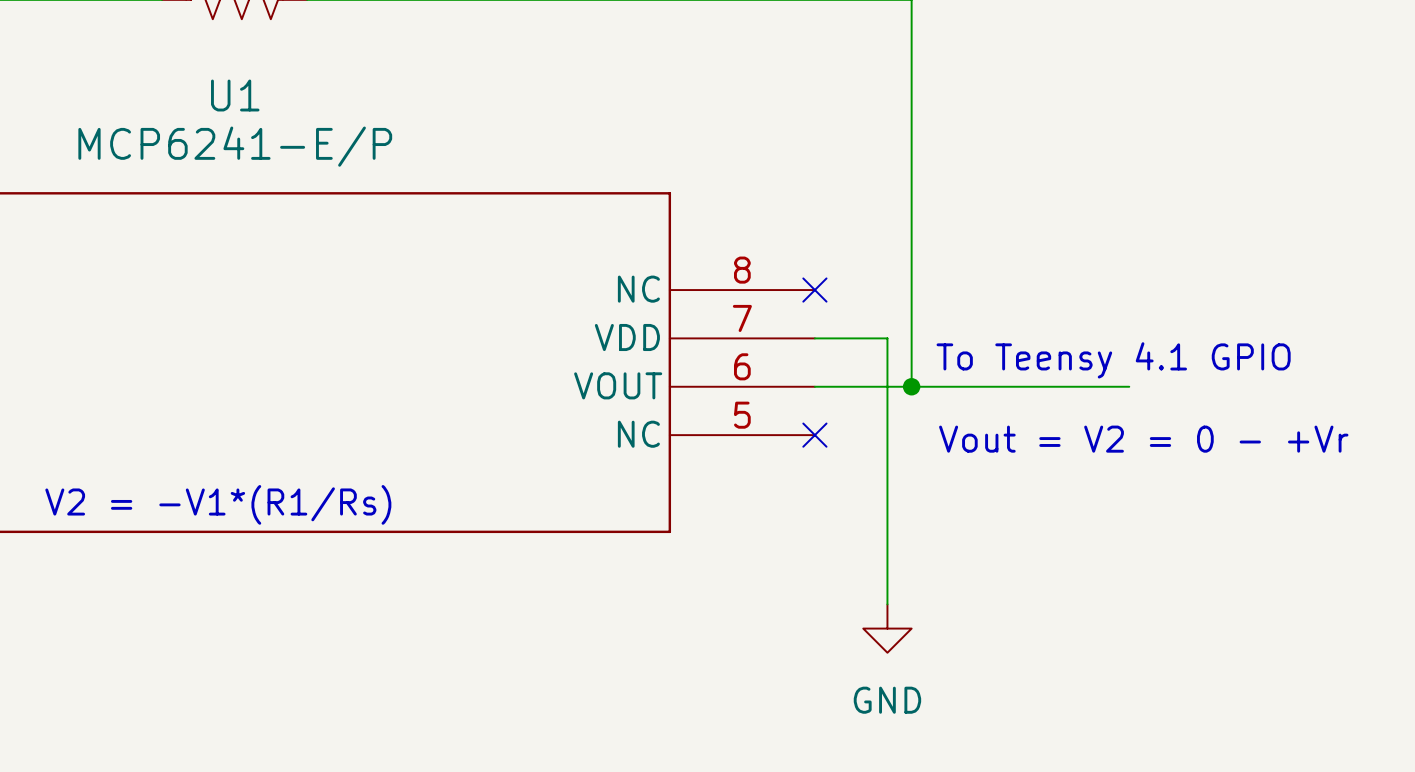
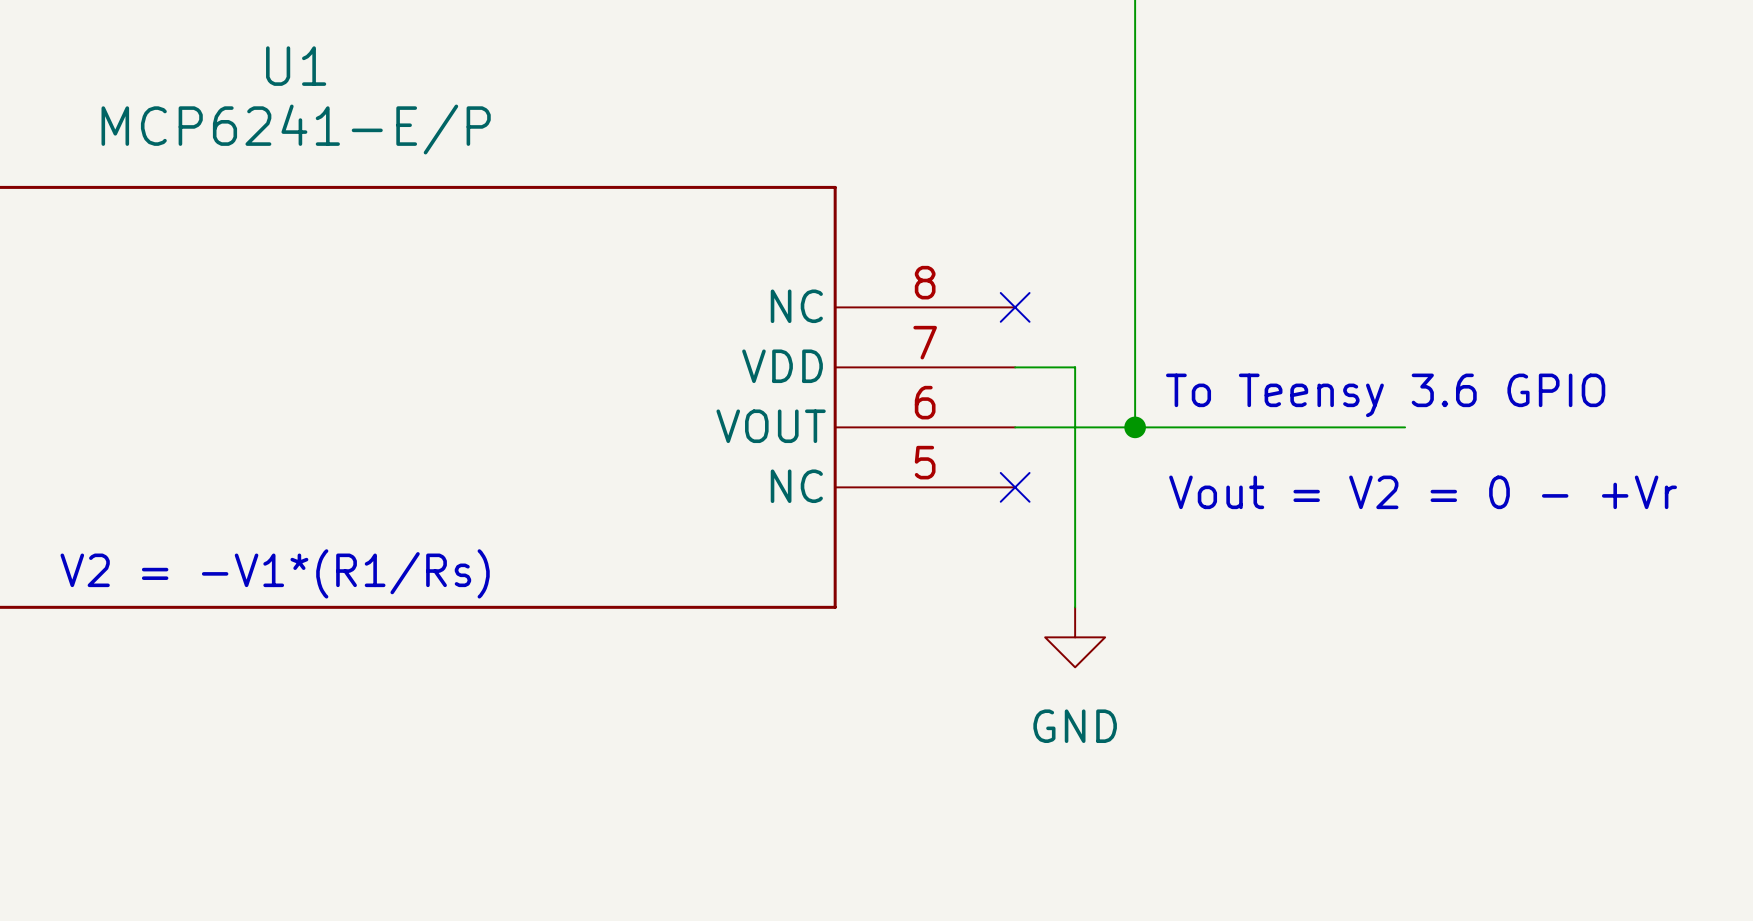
wire: (863, 338) (887, 338) (887, 604) -> (1075, 367) (1075, 607)
text: To Teensy 4.1 GPIO (1113, 360) -> To Teensy 3.6 GPIO (1385, 395)
power symbol position: GND (887, 628) -> GND (1075, 637)

